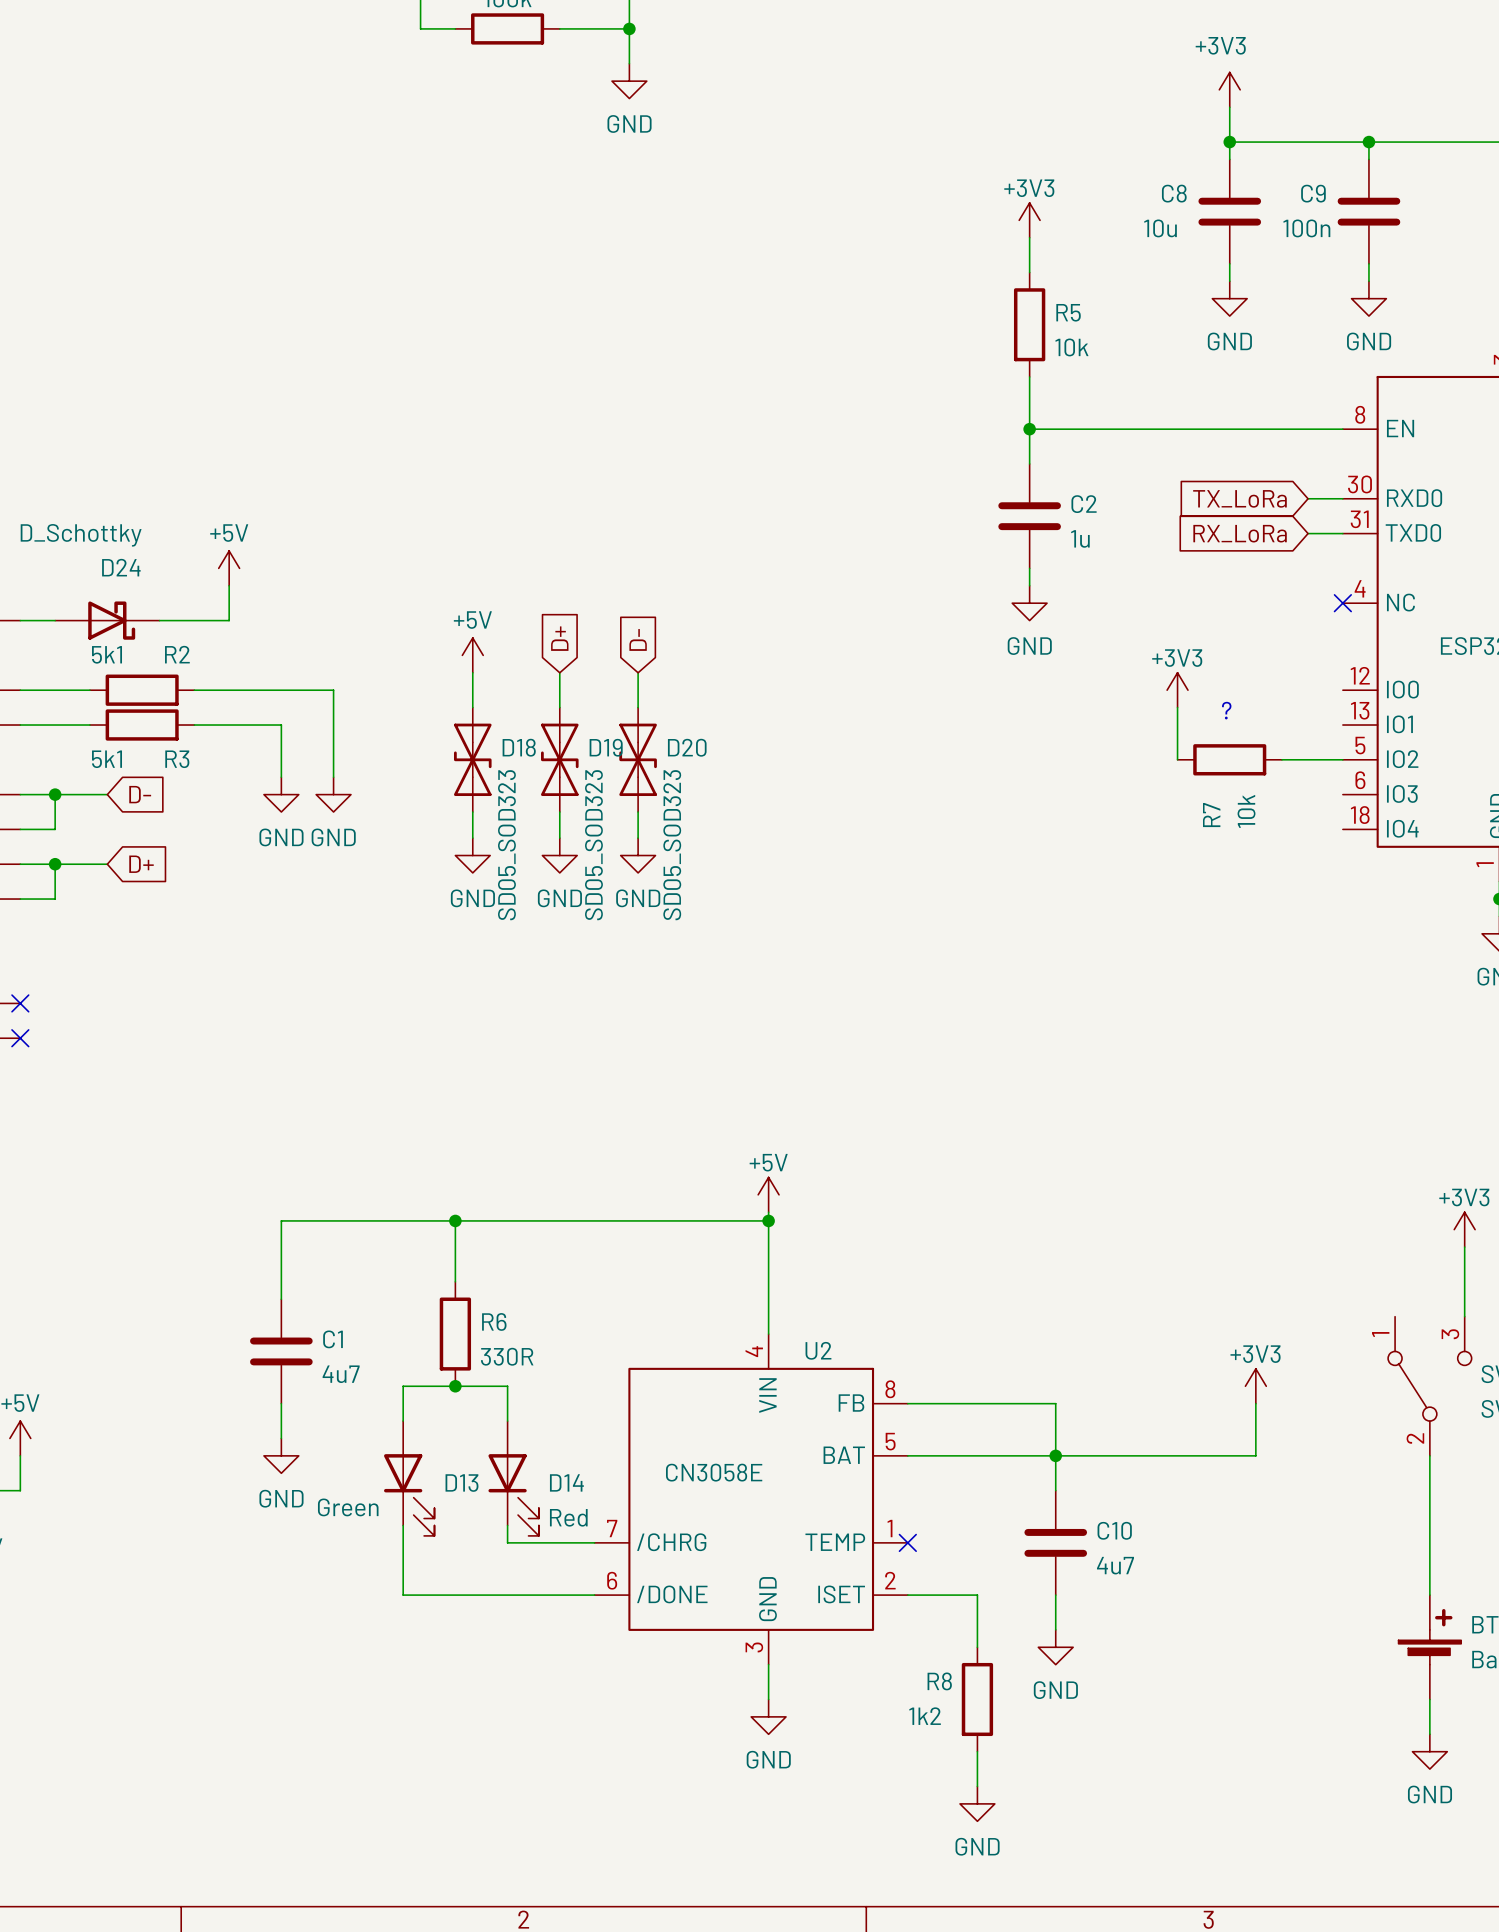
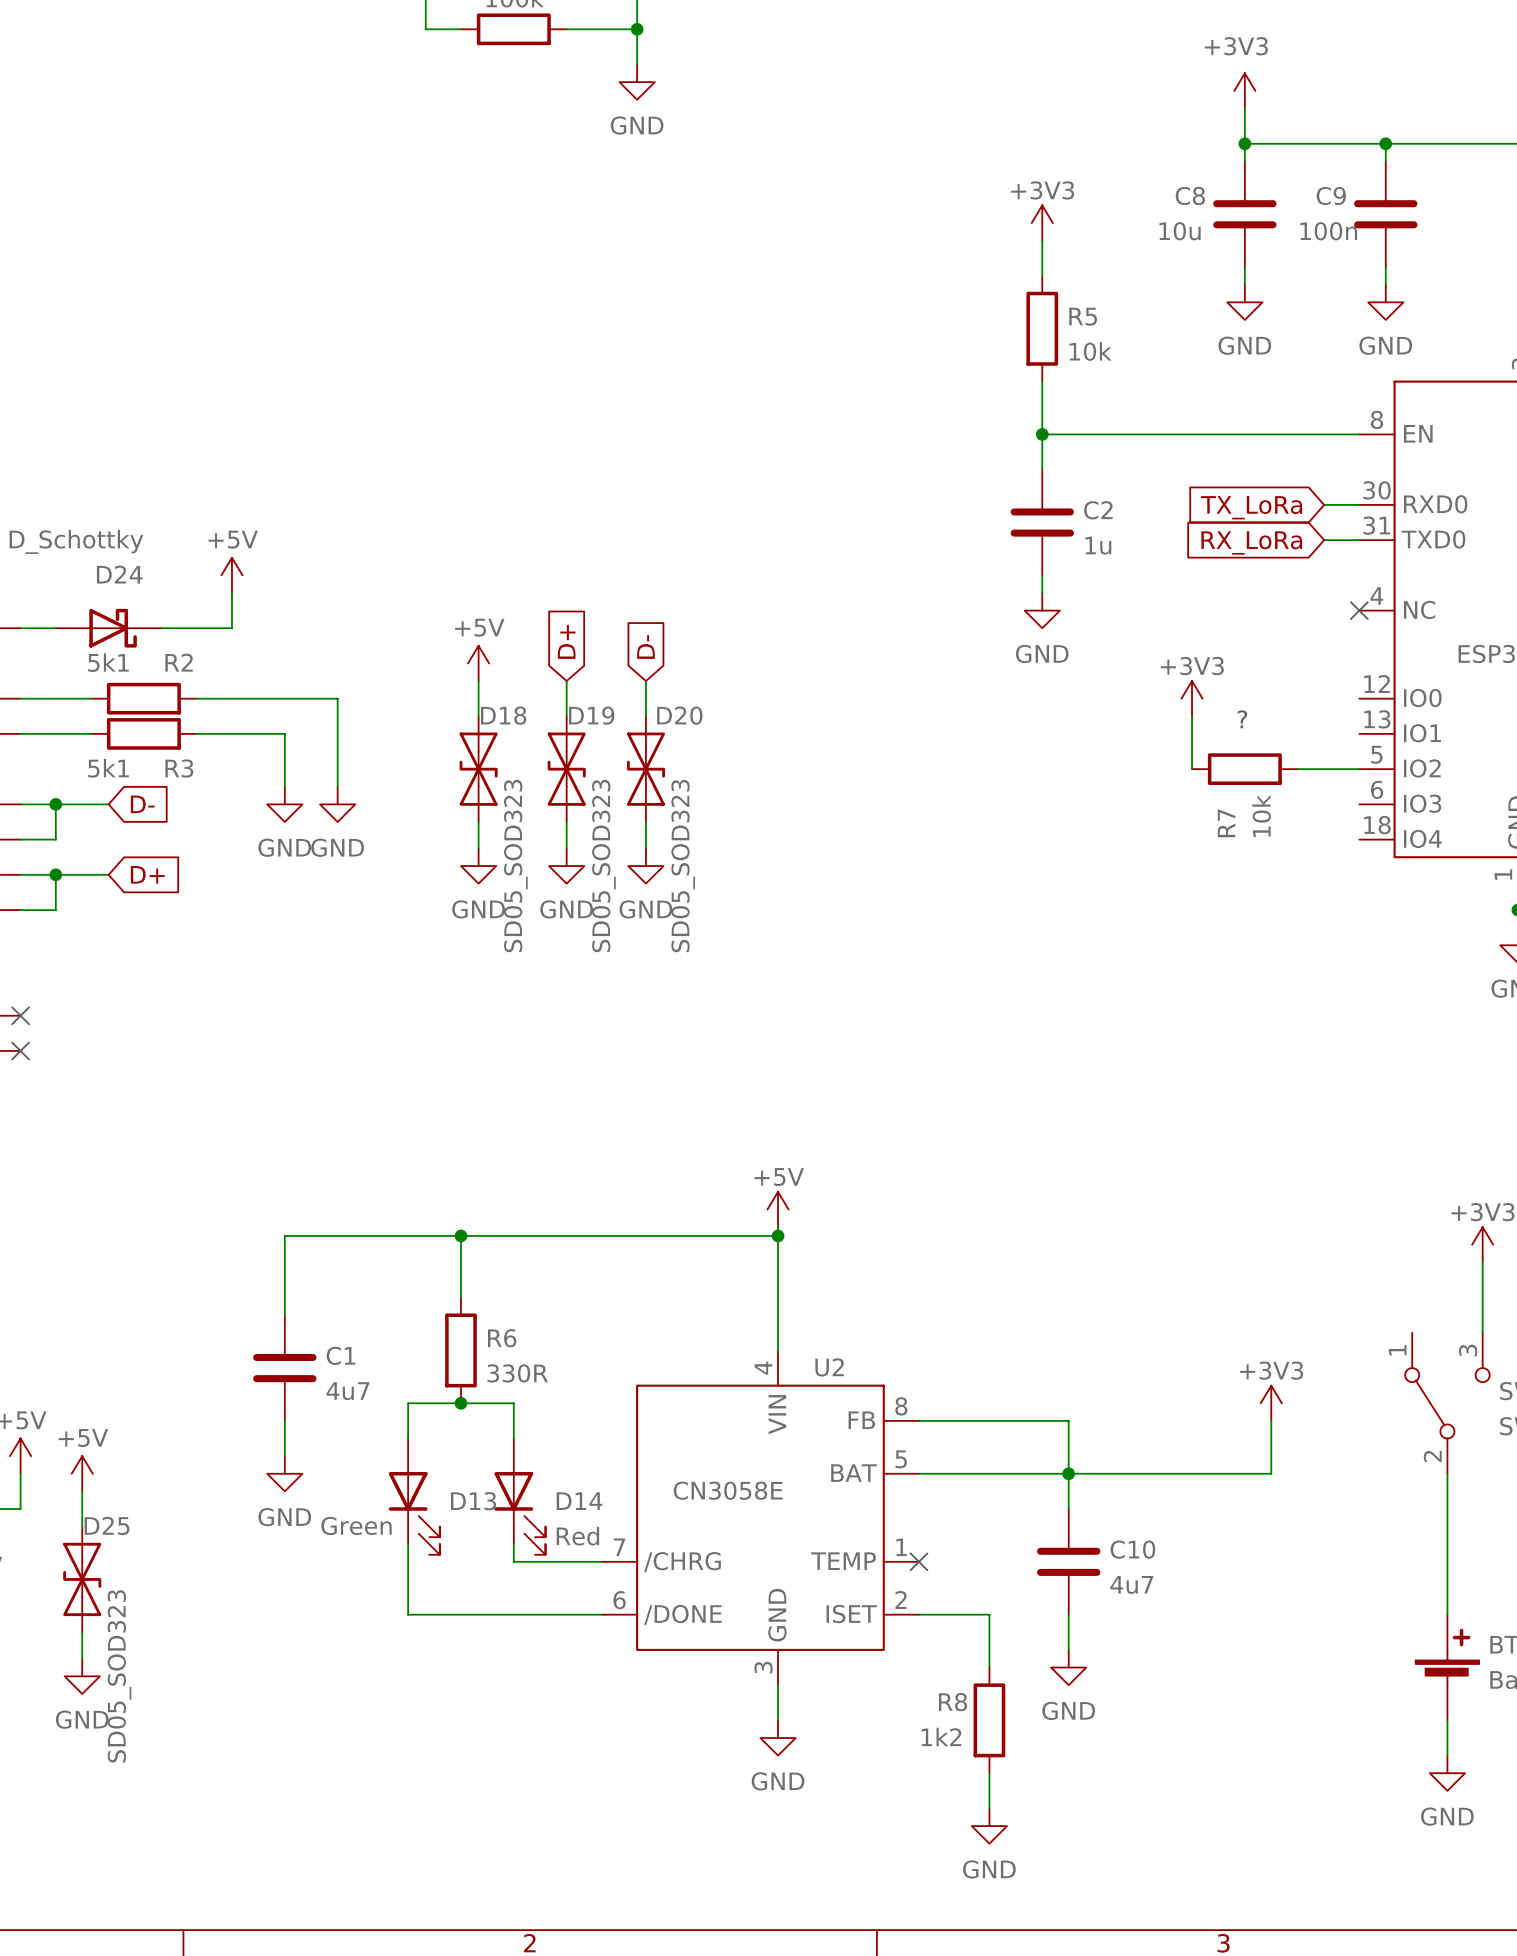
D18 name position: D18 (519, 747) -> D18 (503, 715)
D19 name position: D19 (606, 747) -> D19 (591, 715)
D20 name position: D20 (687, 747) -> D20 (679, 715)
power symbol: none -> +5V (82, 1473)
wire: none -> (82, 1491) (82, 1526)
D25: none -> SD05_SOD323 (82, 1579)
wire: none -> (82, 1632) (82, 1658)
power symbol: none -> GND (82, 1676)

